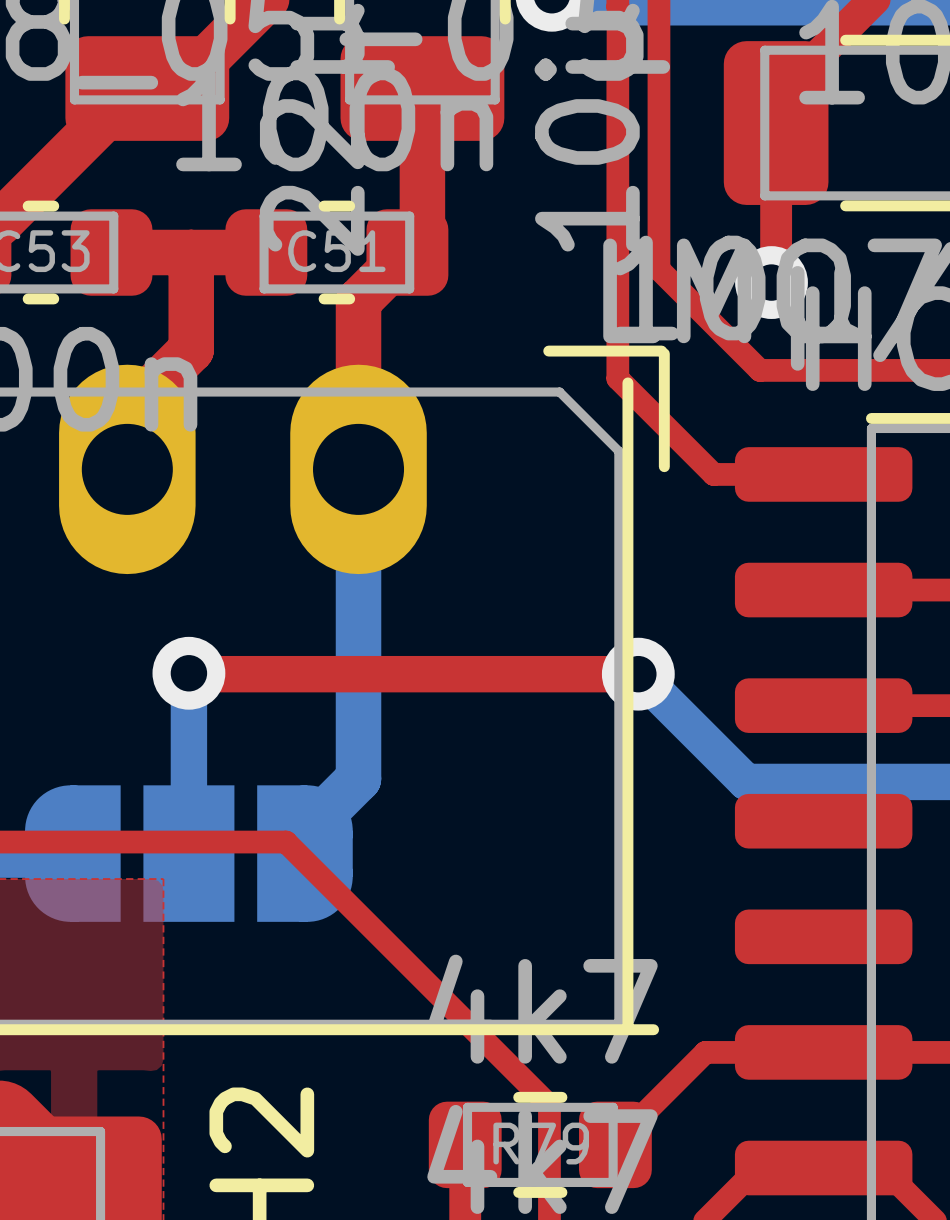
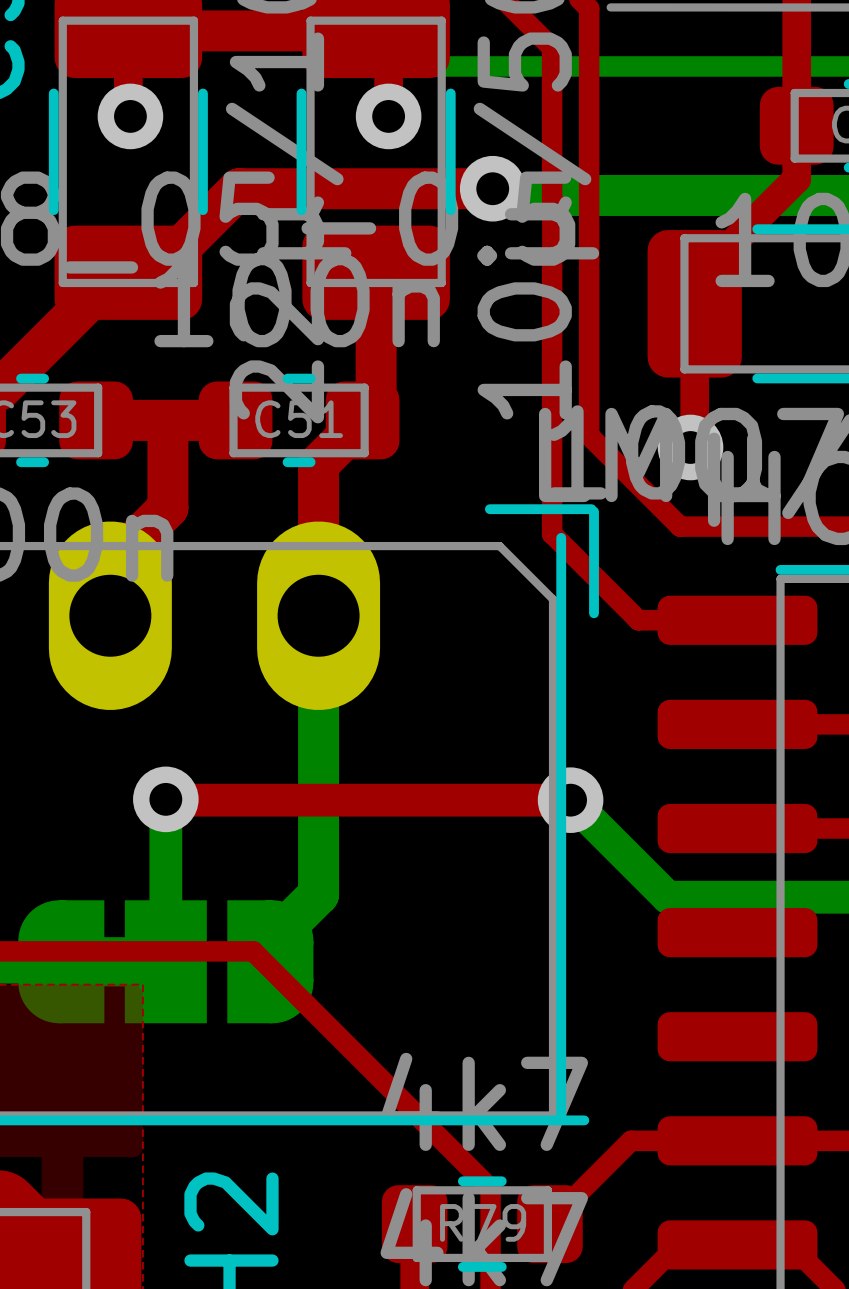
part footprint: [25, 785, 353, 922] -> [18, 900, 314, 1024]

